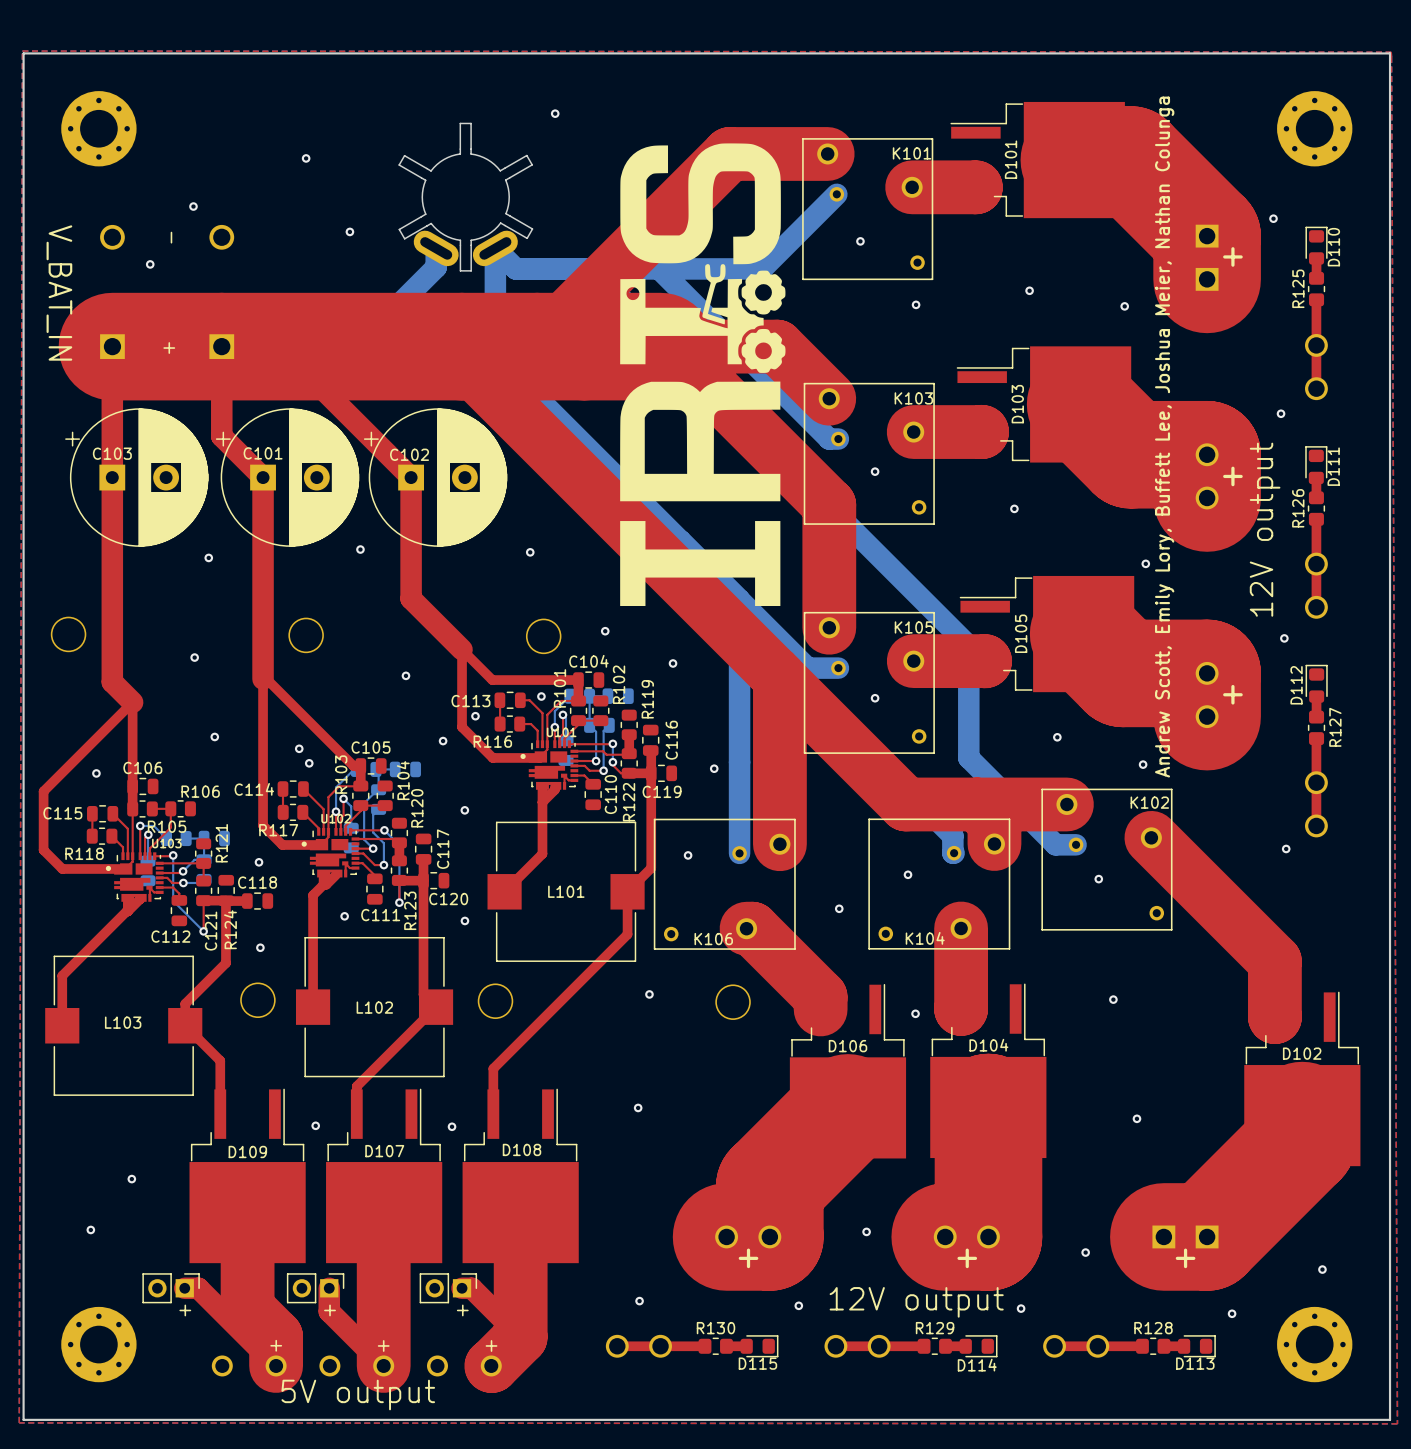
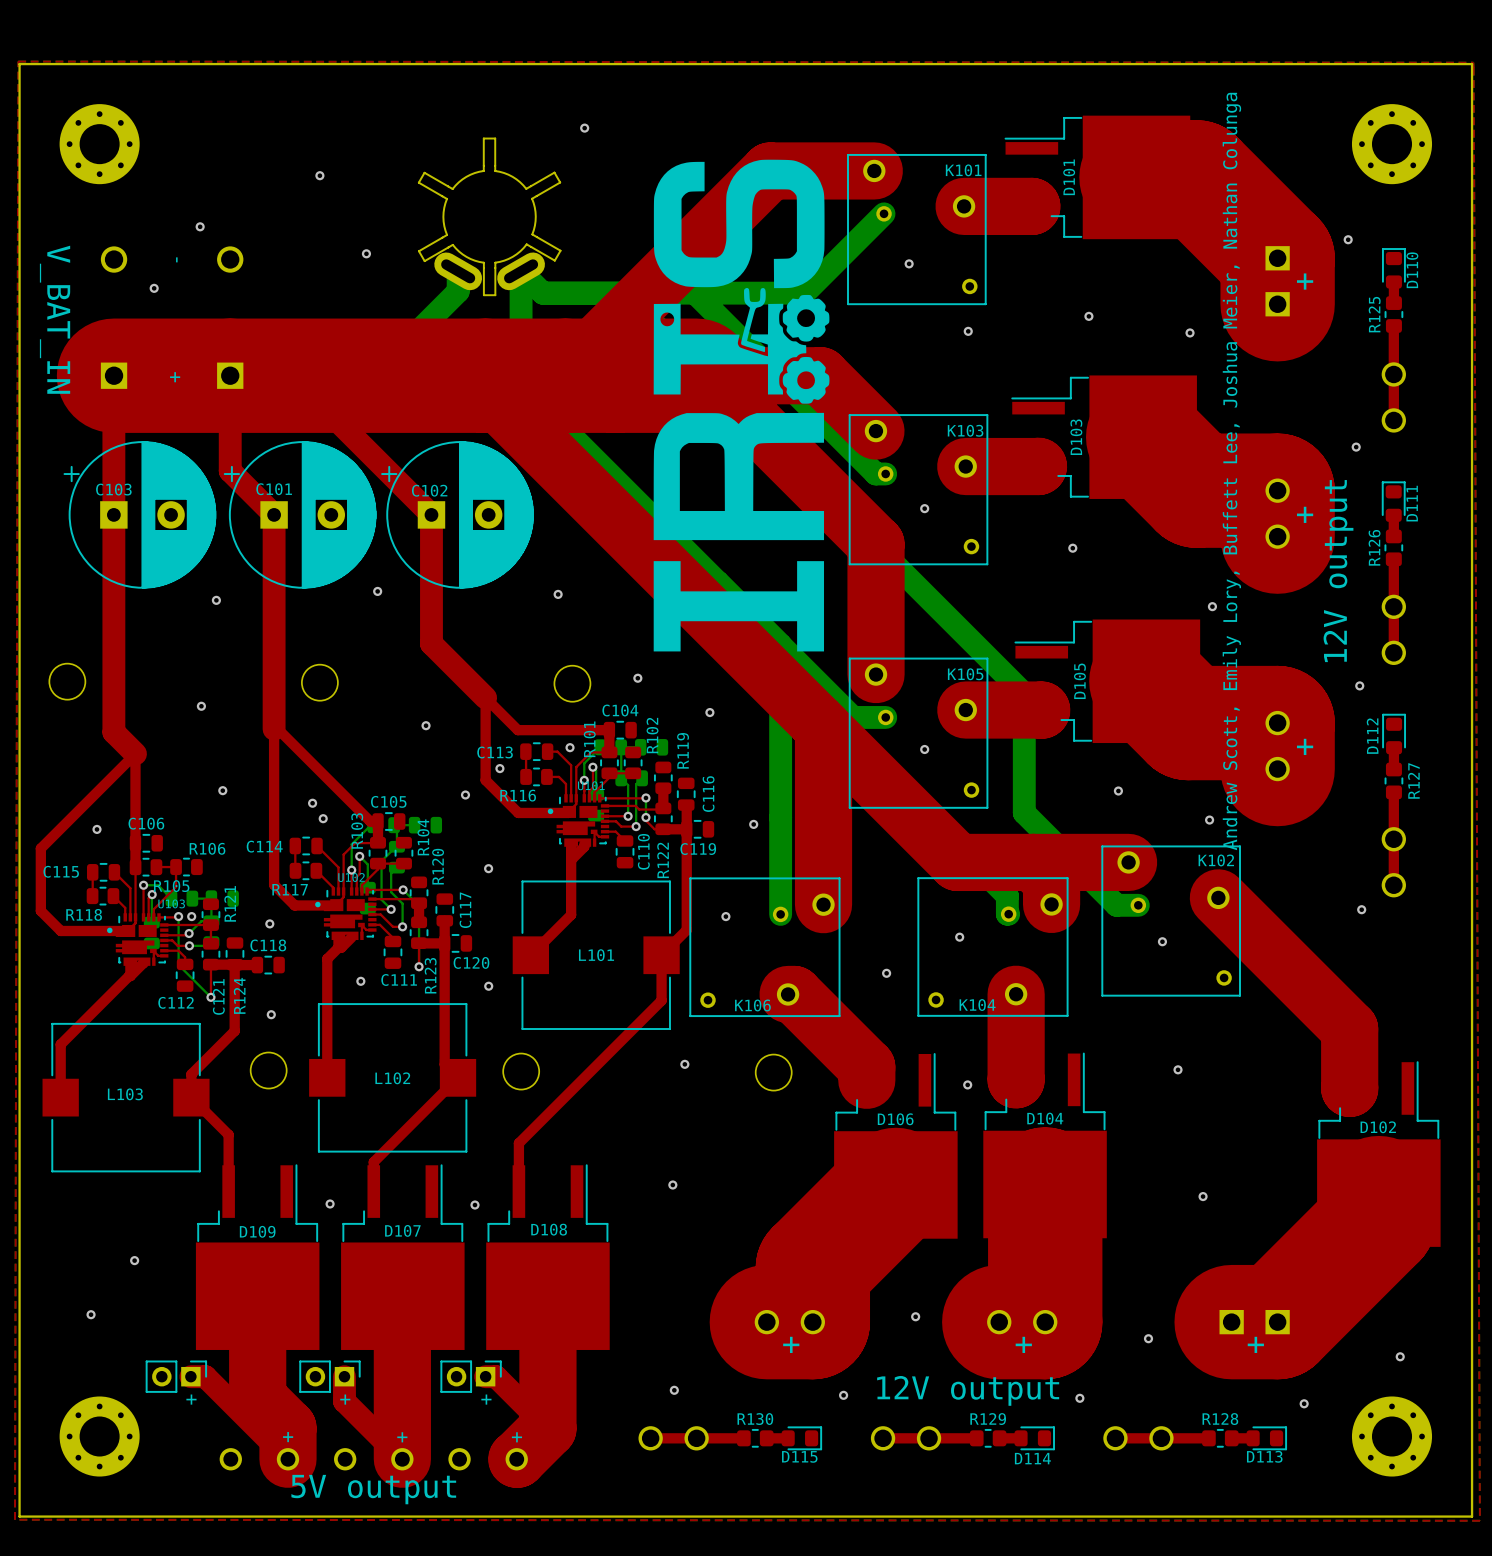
via: none -> (191, 916)

